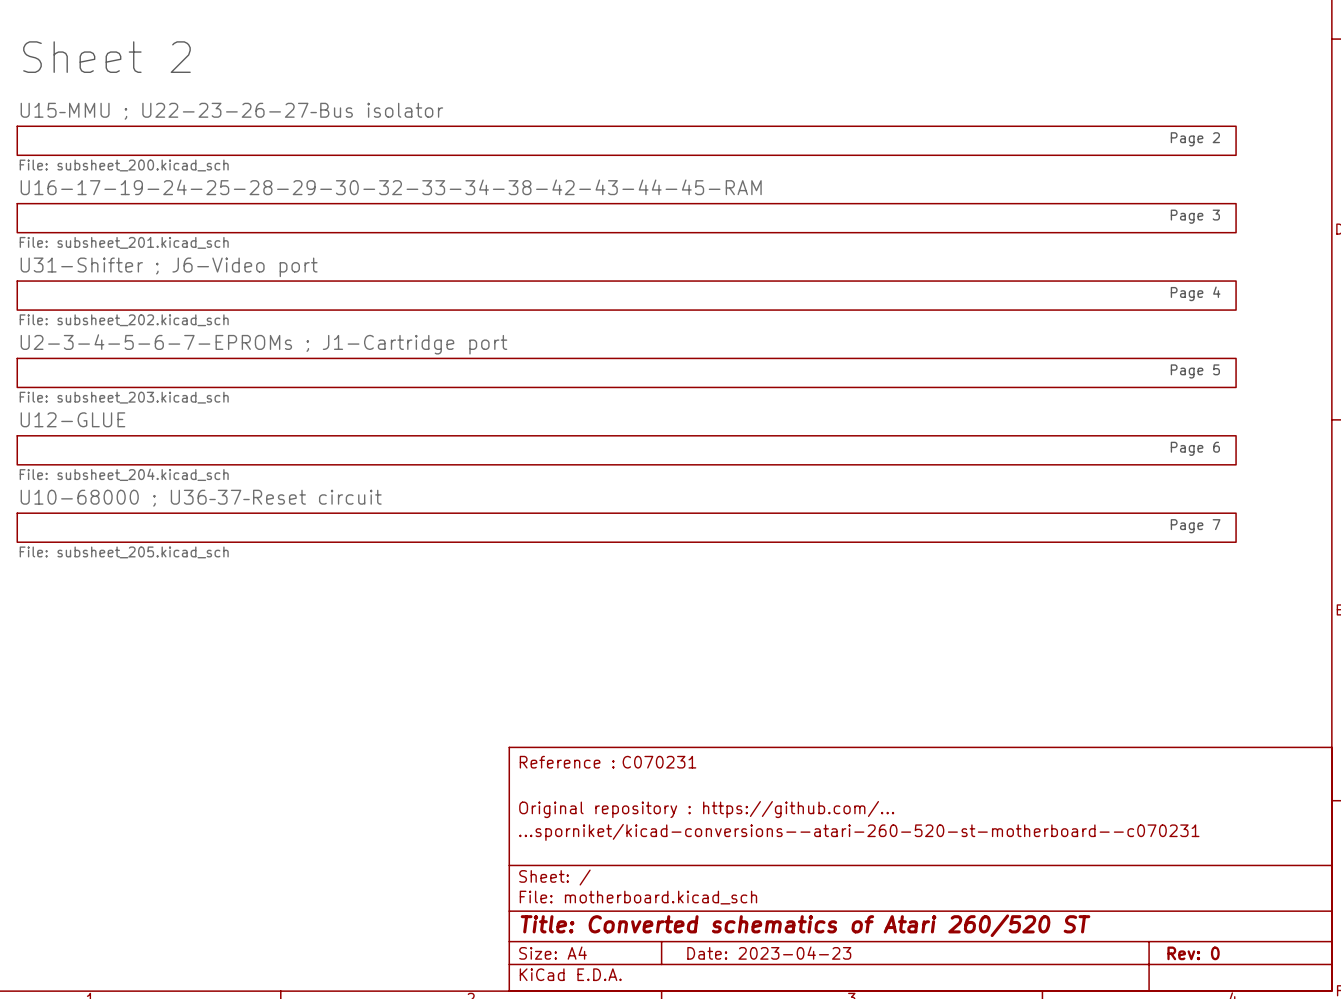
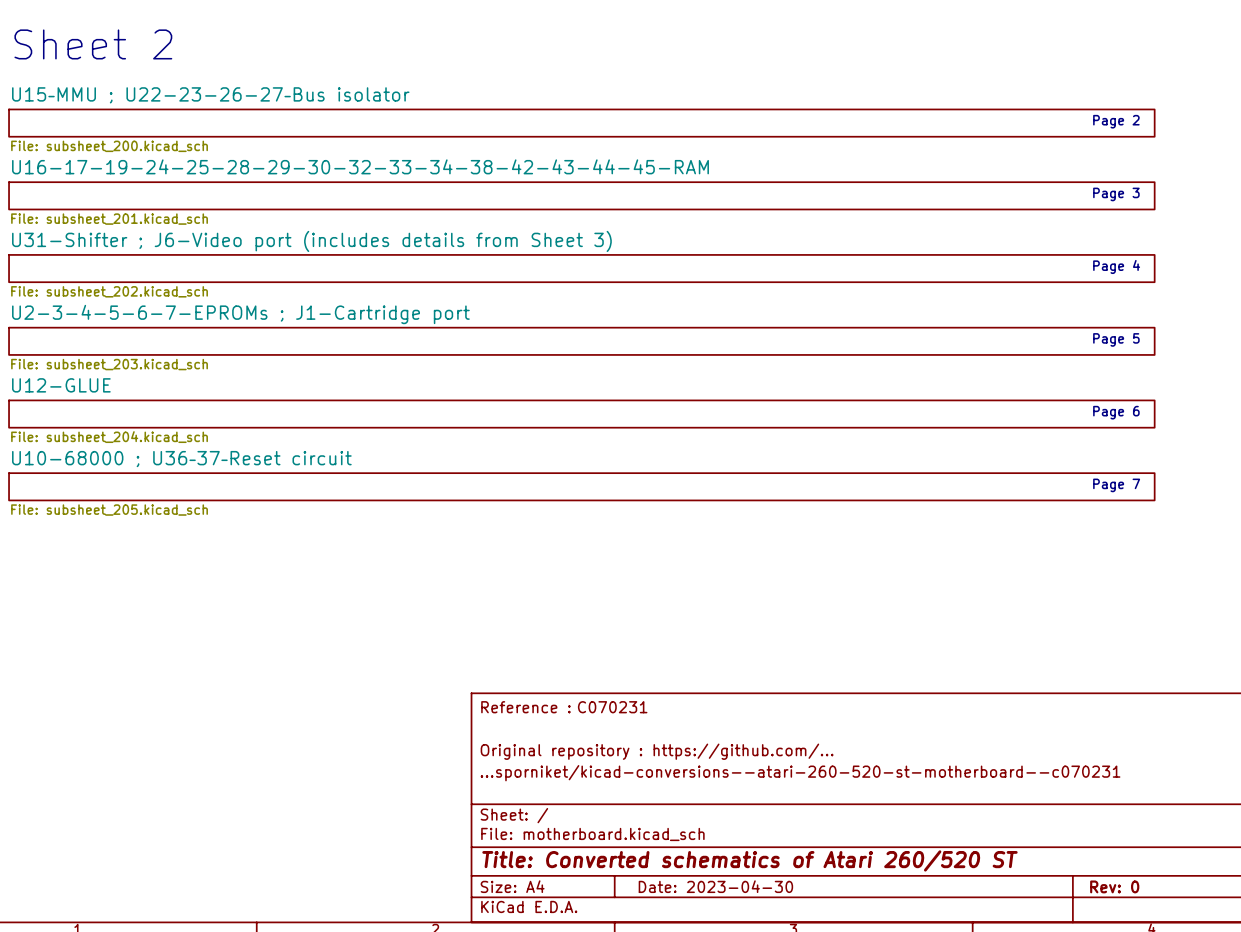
sheet U31-Shifter ; J6-Video port name: U31-Shifter ; J6-Video port (169, 267) -> U31-Shifter ; J6-Video port (includes details from Sheet 3) (311, 241)
title block: Date: 2023-04-23 (769, 953) -> Date: 2023-04-30 (715, 886)

